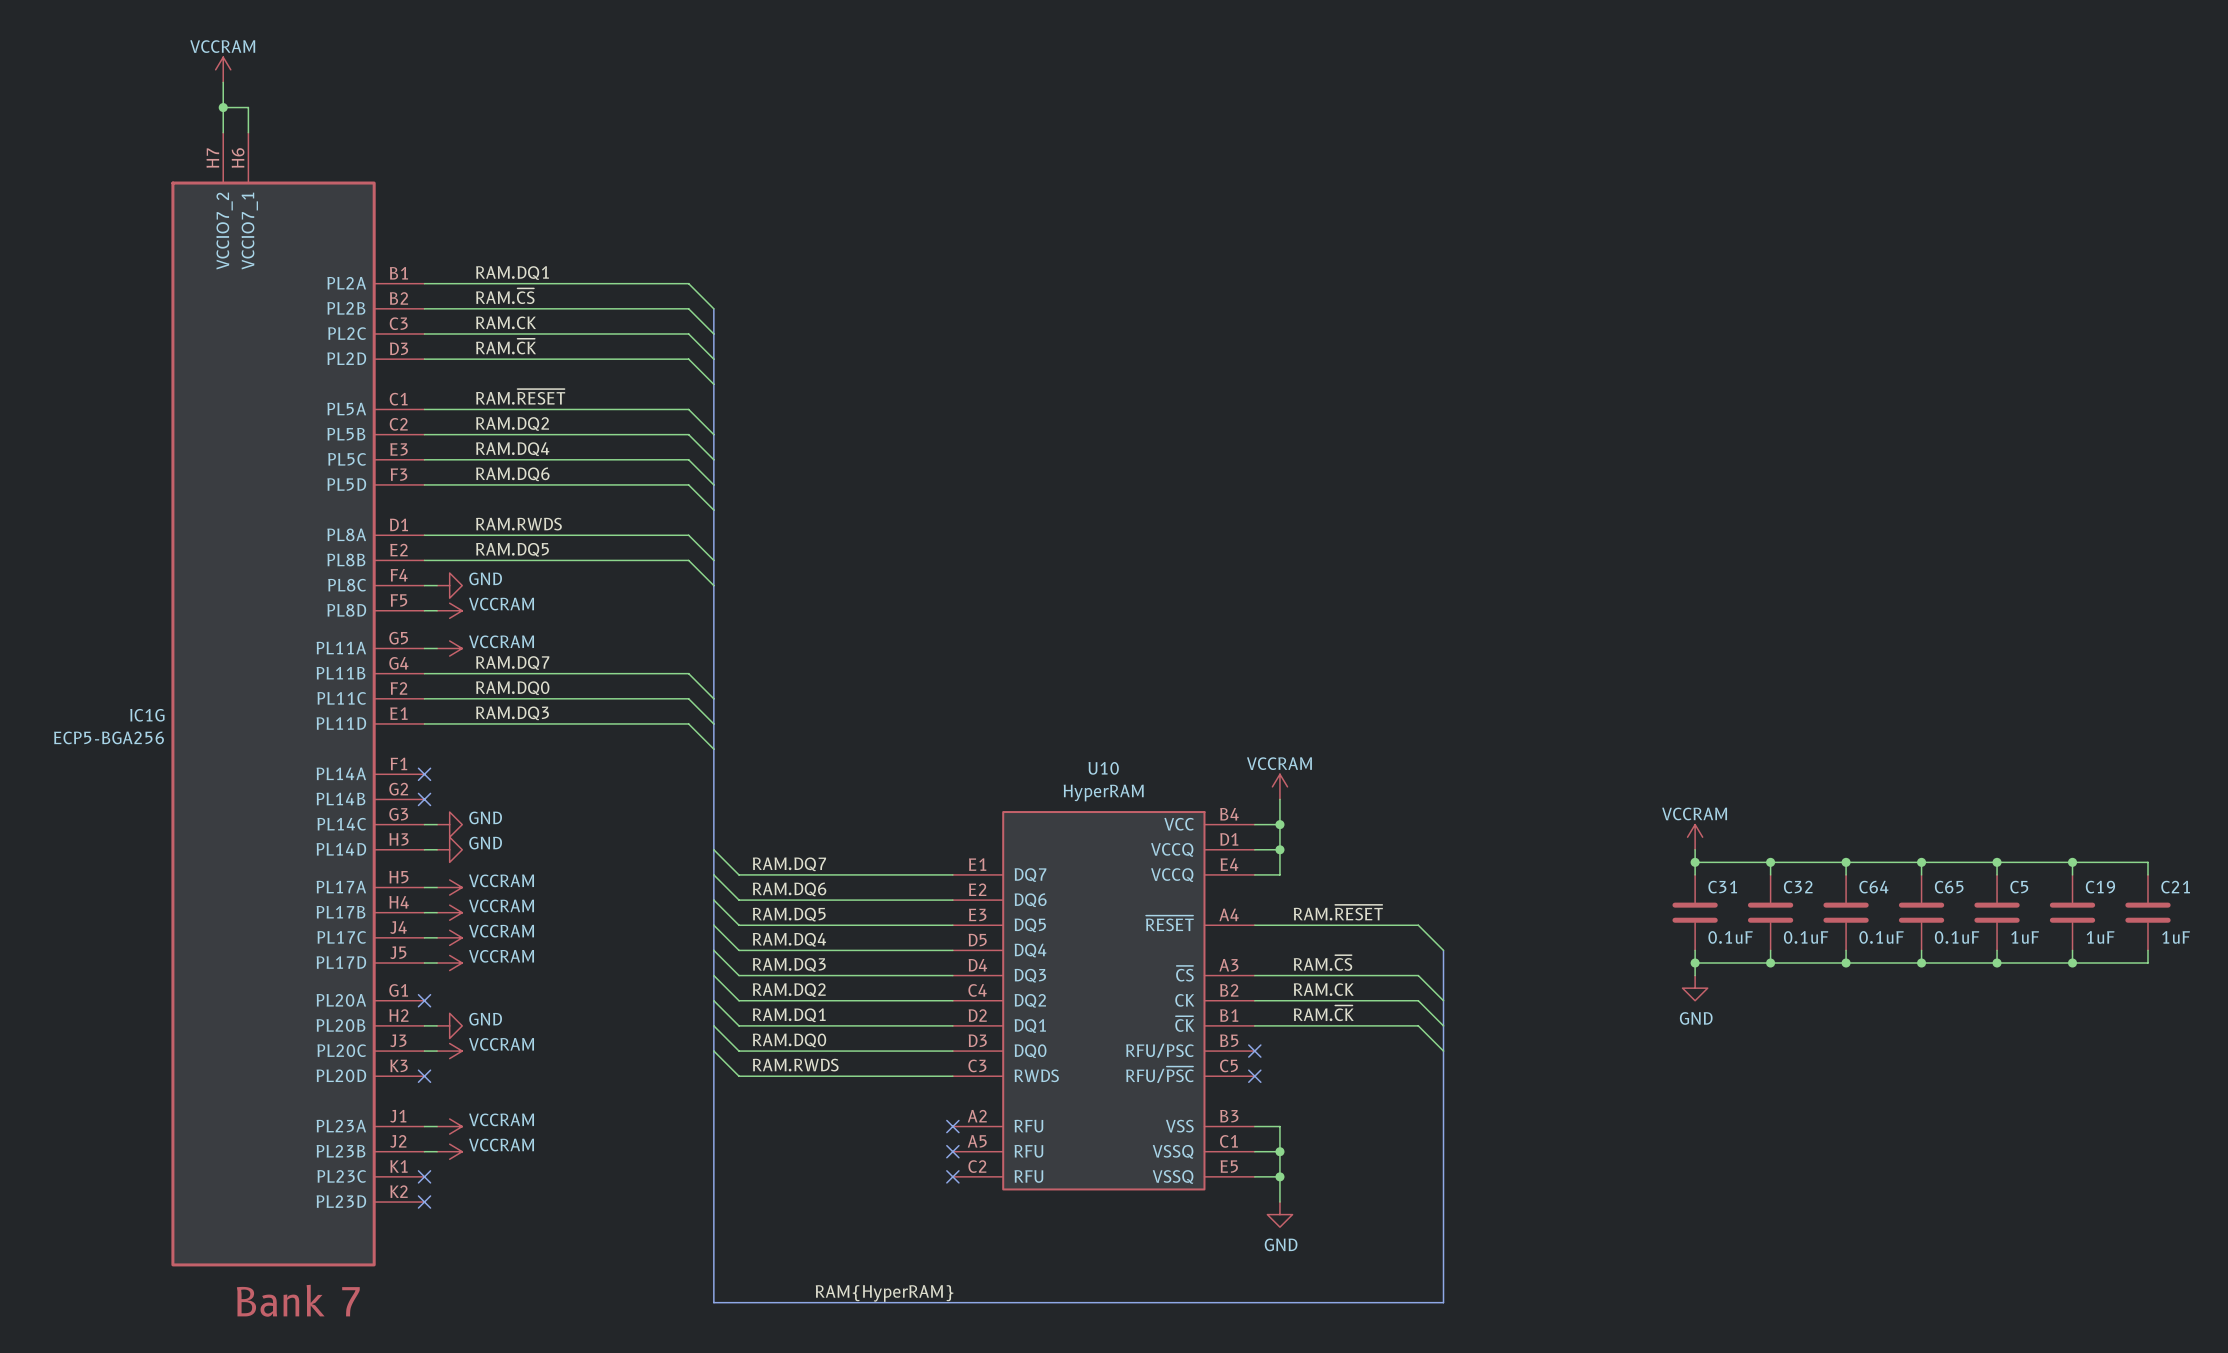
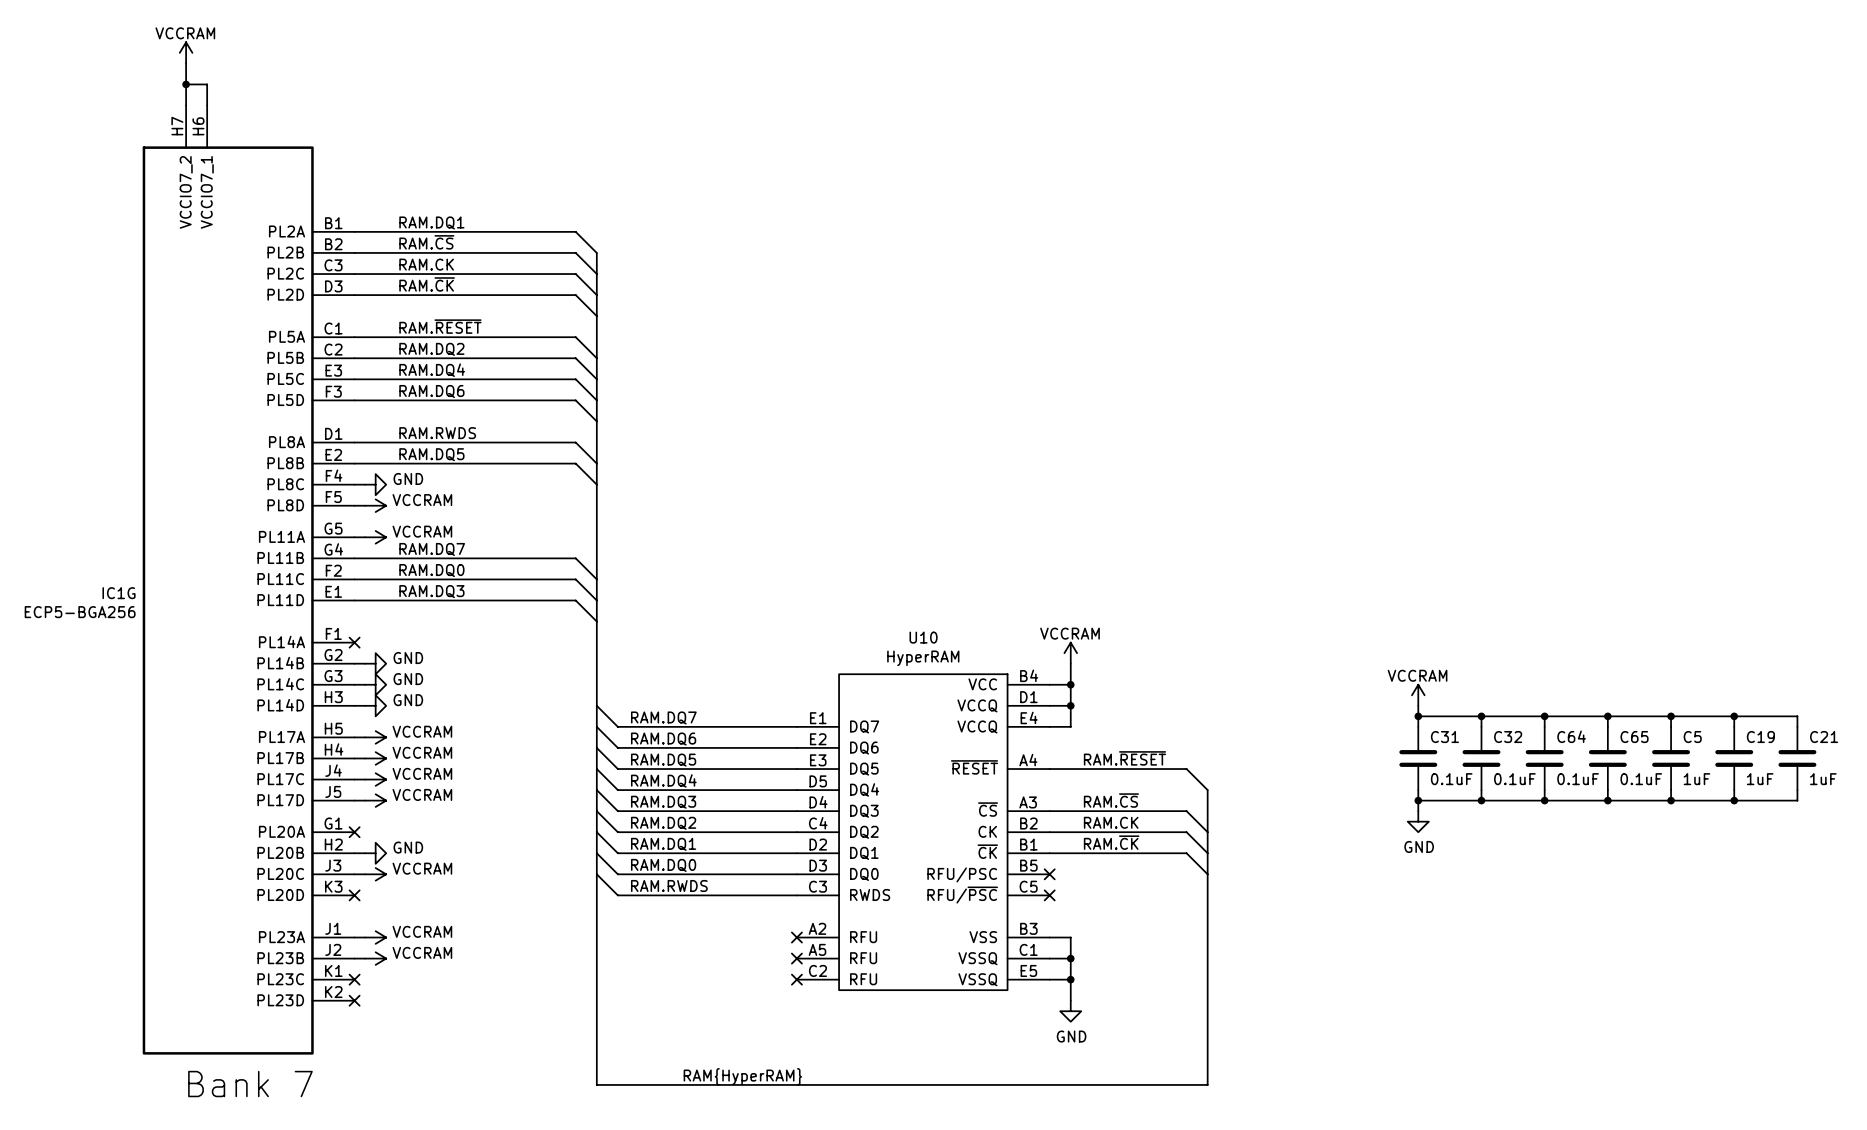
wire: none -> (354, 663) (365, 663)
no-connect mark: (424, 799) -> none
power symbol: none -> GND (375, 663)

